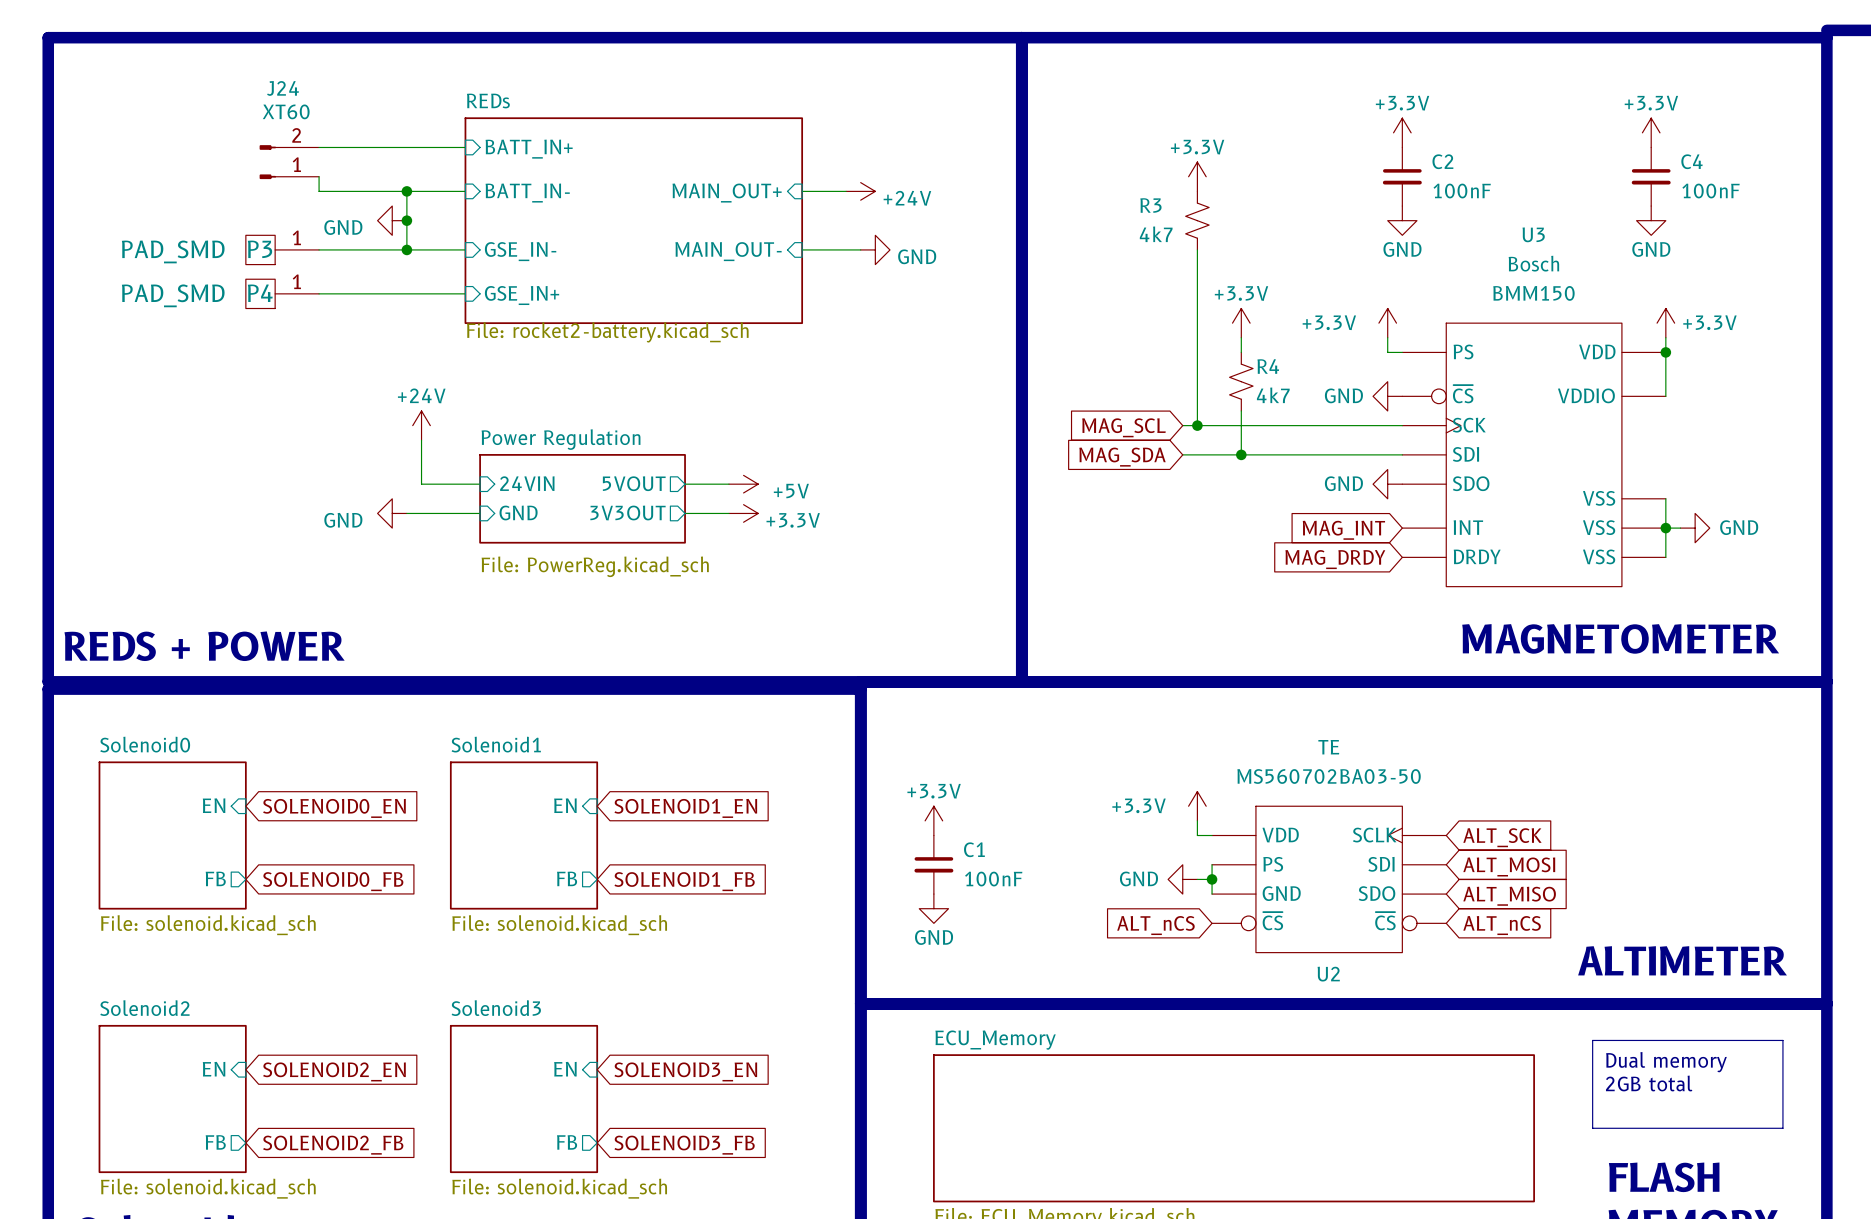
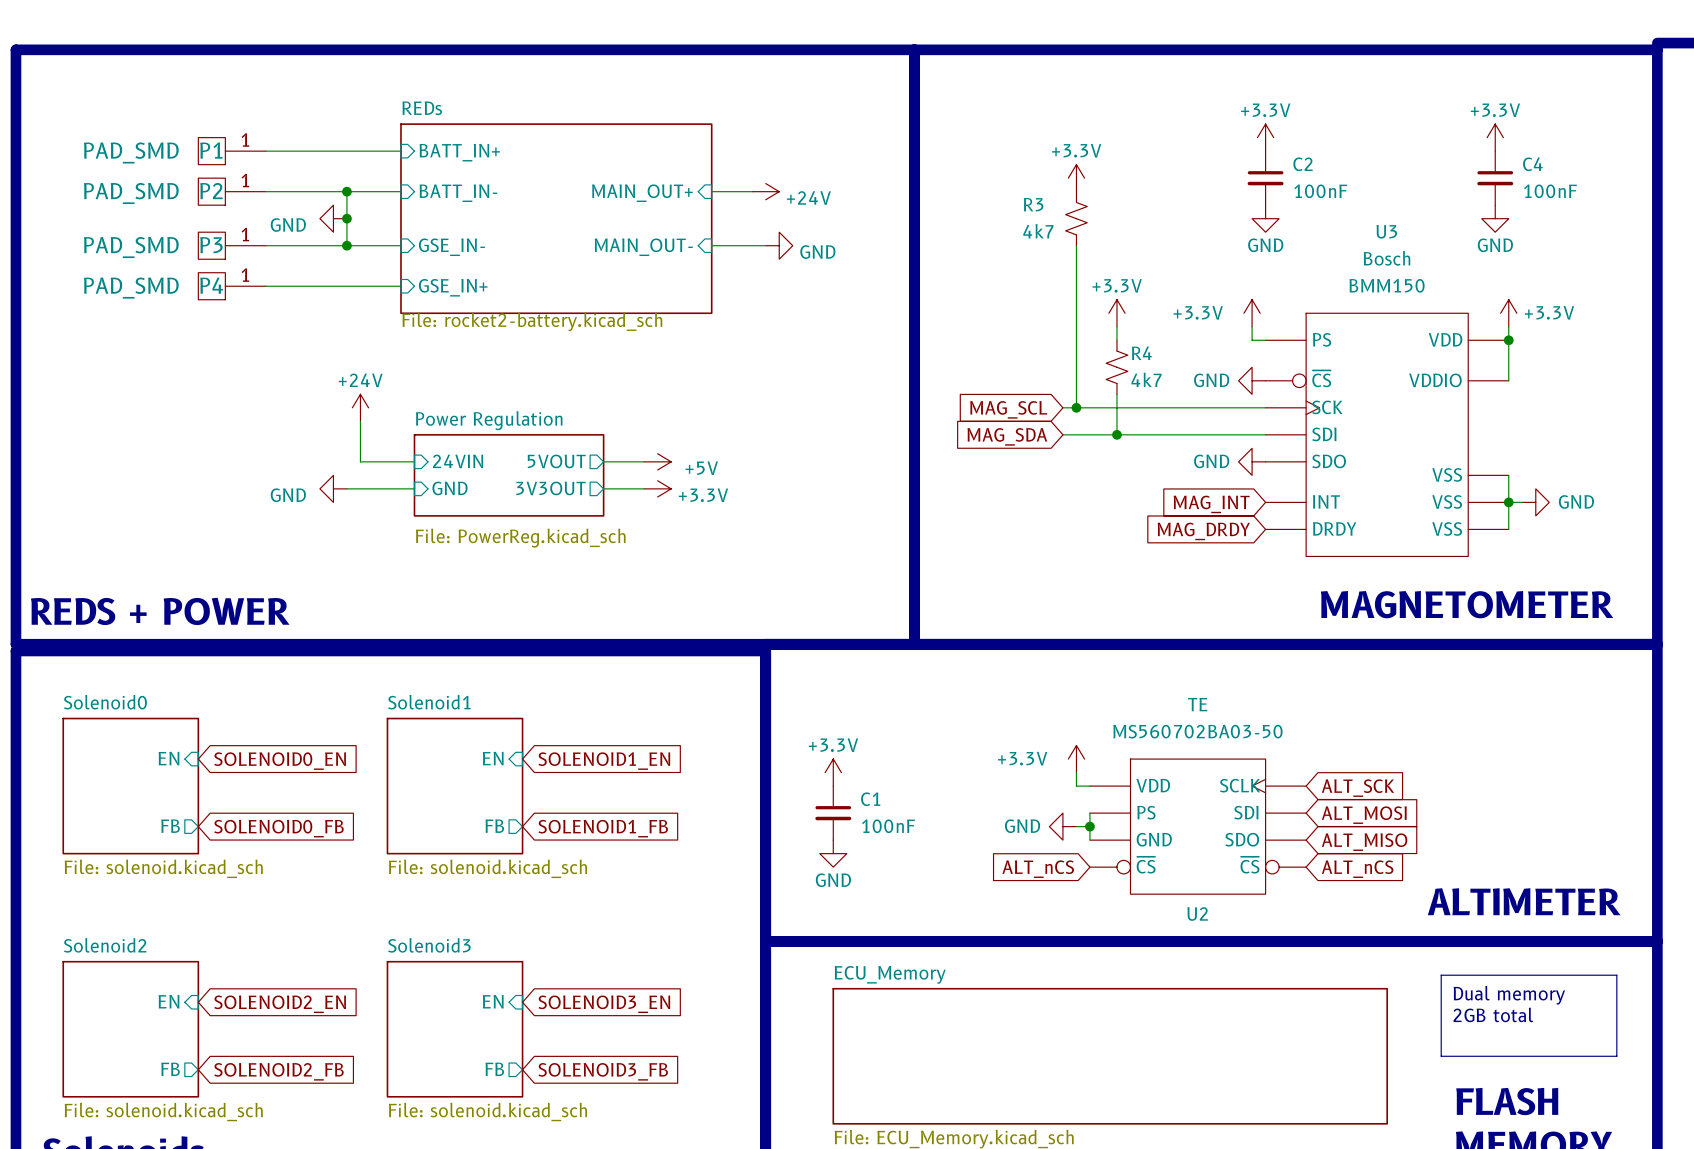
P1: none -> PAD_SMD (232, 151)
J24: XT60 (289, 162) -> none
wire: (319, 176) (319, 191) -> none
P2: none -> PAD_SMD (232, 191)

